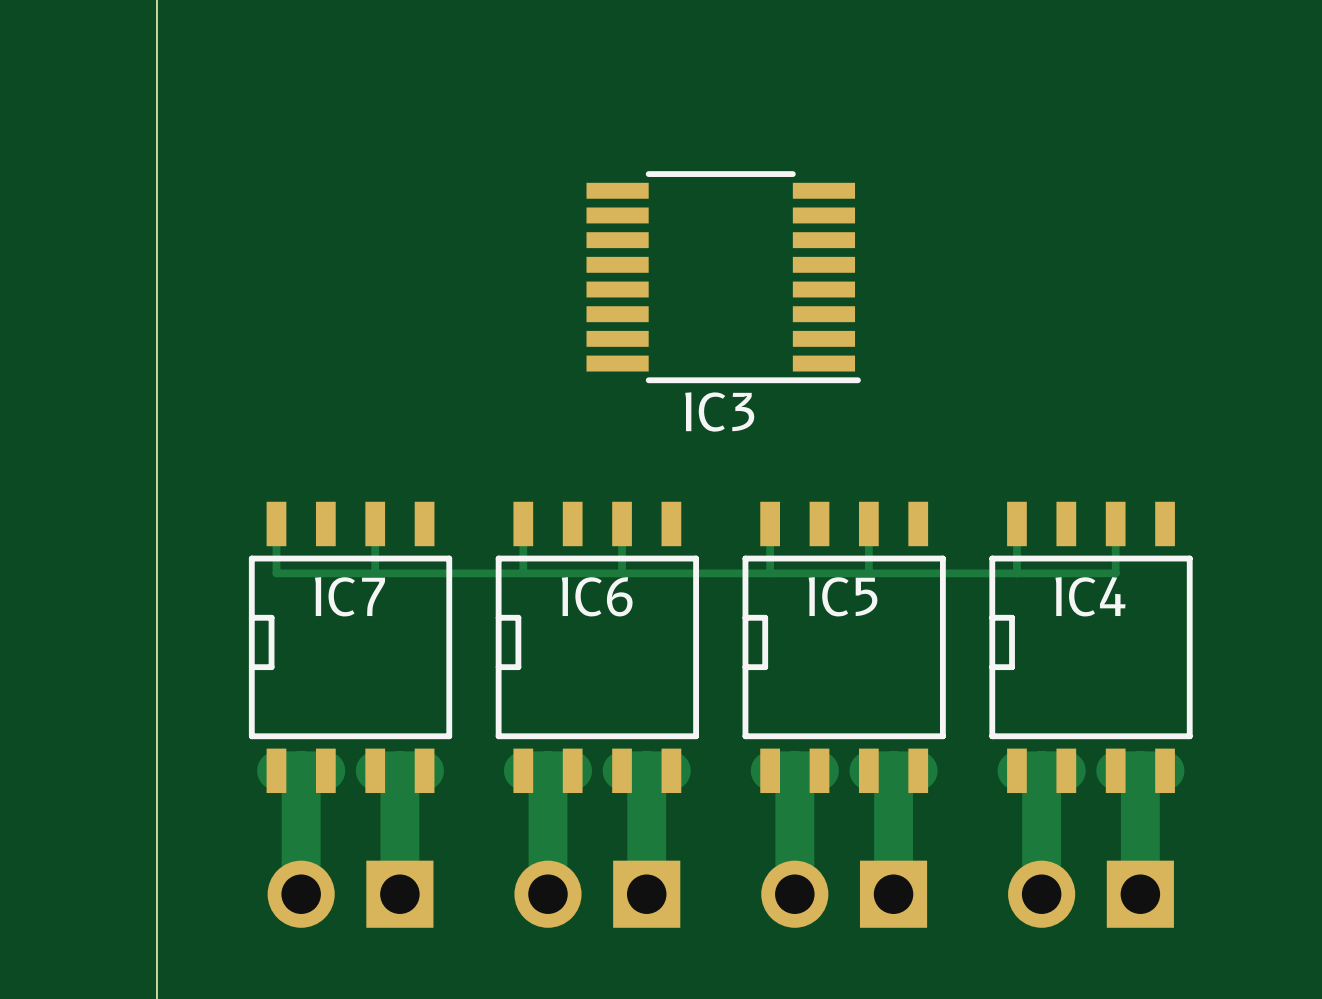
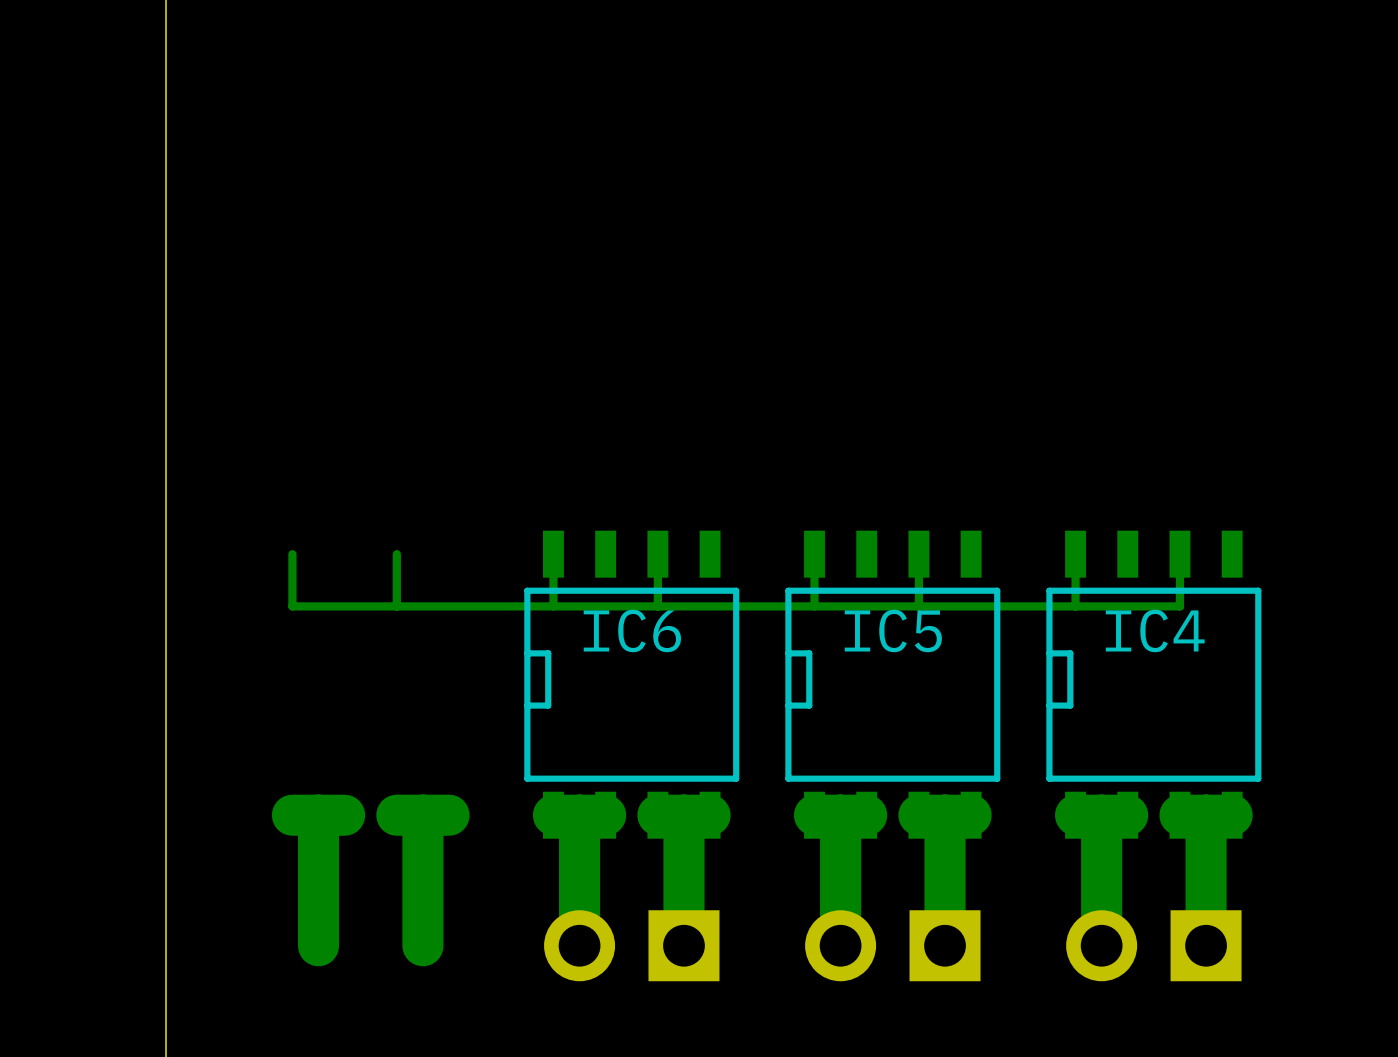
IC3: (723, 277) -> none
IC7: (350, 647) -> none
part: (350, 894) -> none

